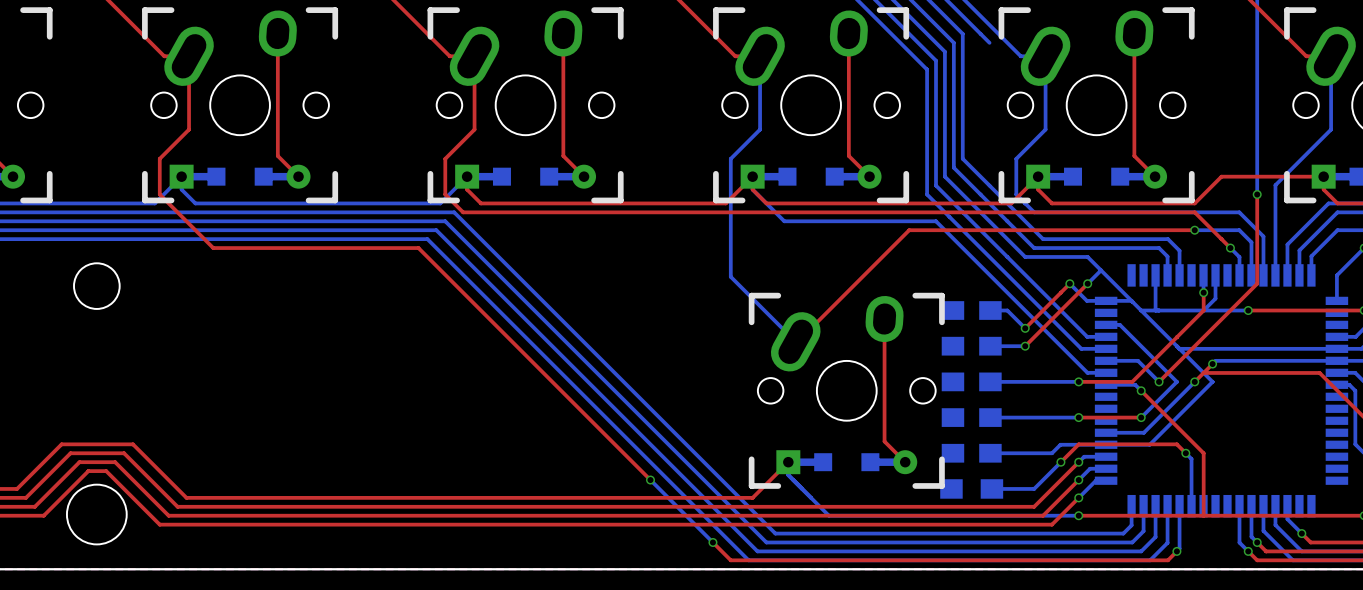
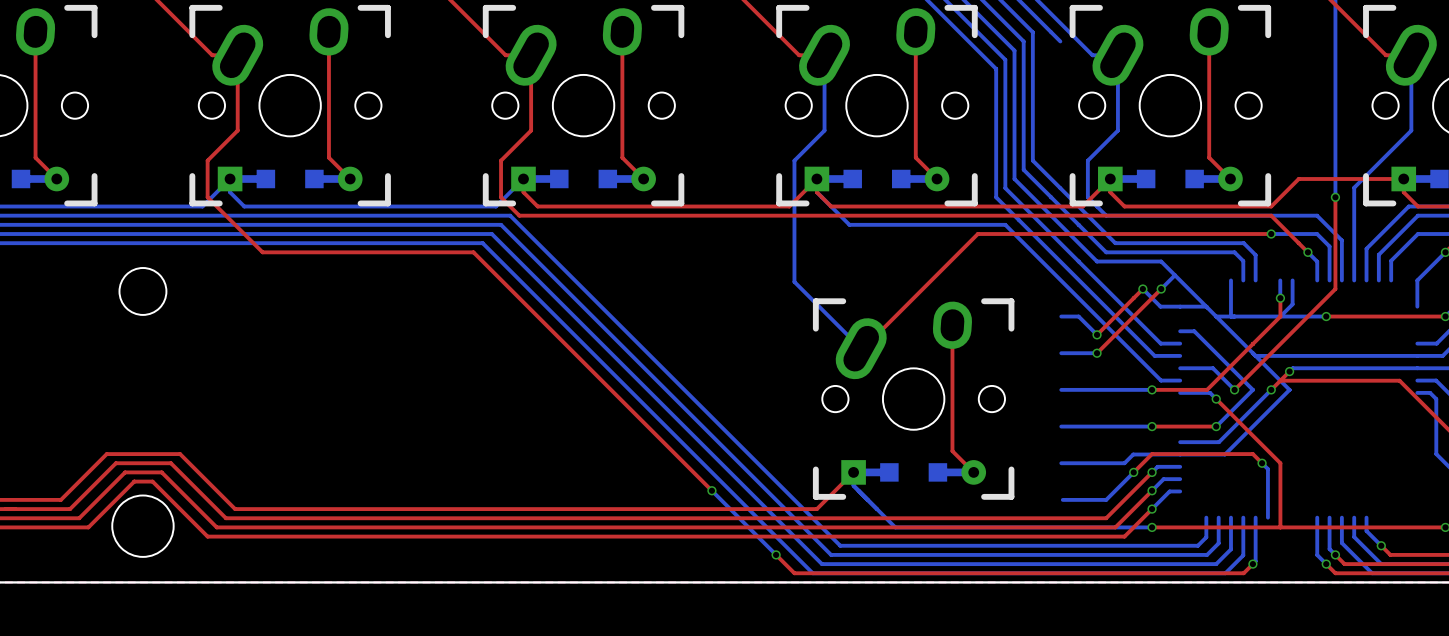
part: (971, 310) -> none
part: (971, 346) -> none
part: (971, 381) -> none
part: (1221, 390) -> none
part: (971, 417) -> none
part: (971, 453) -> none
part: (971, 488) -> none

